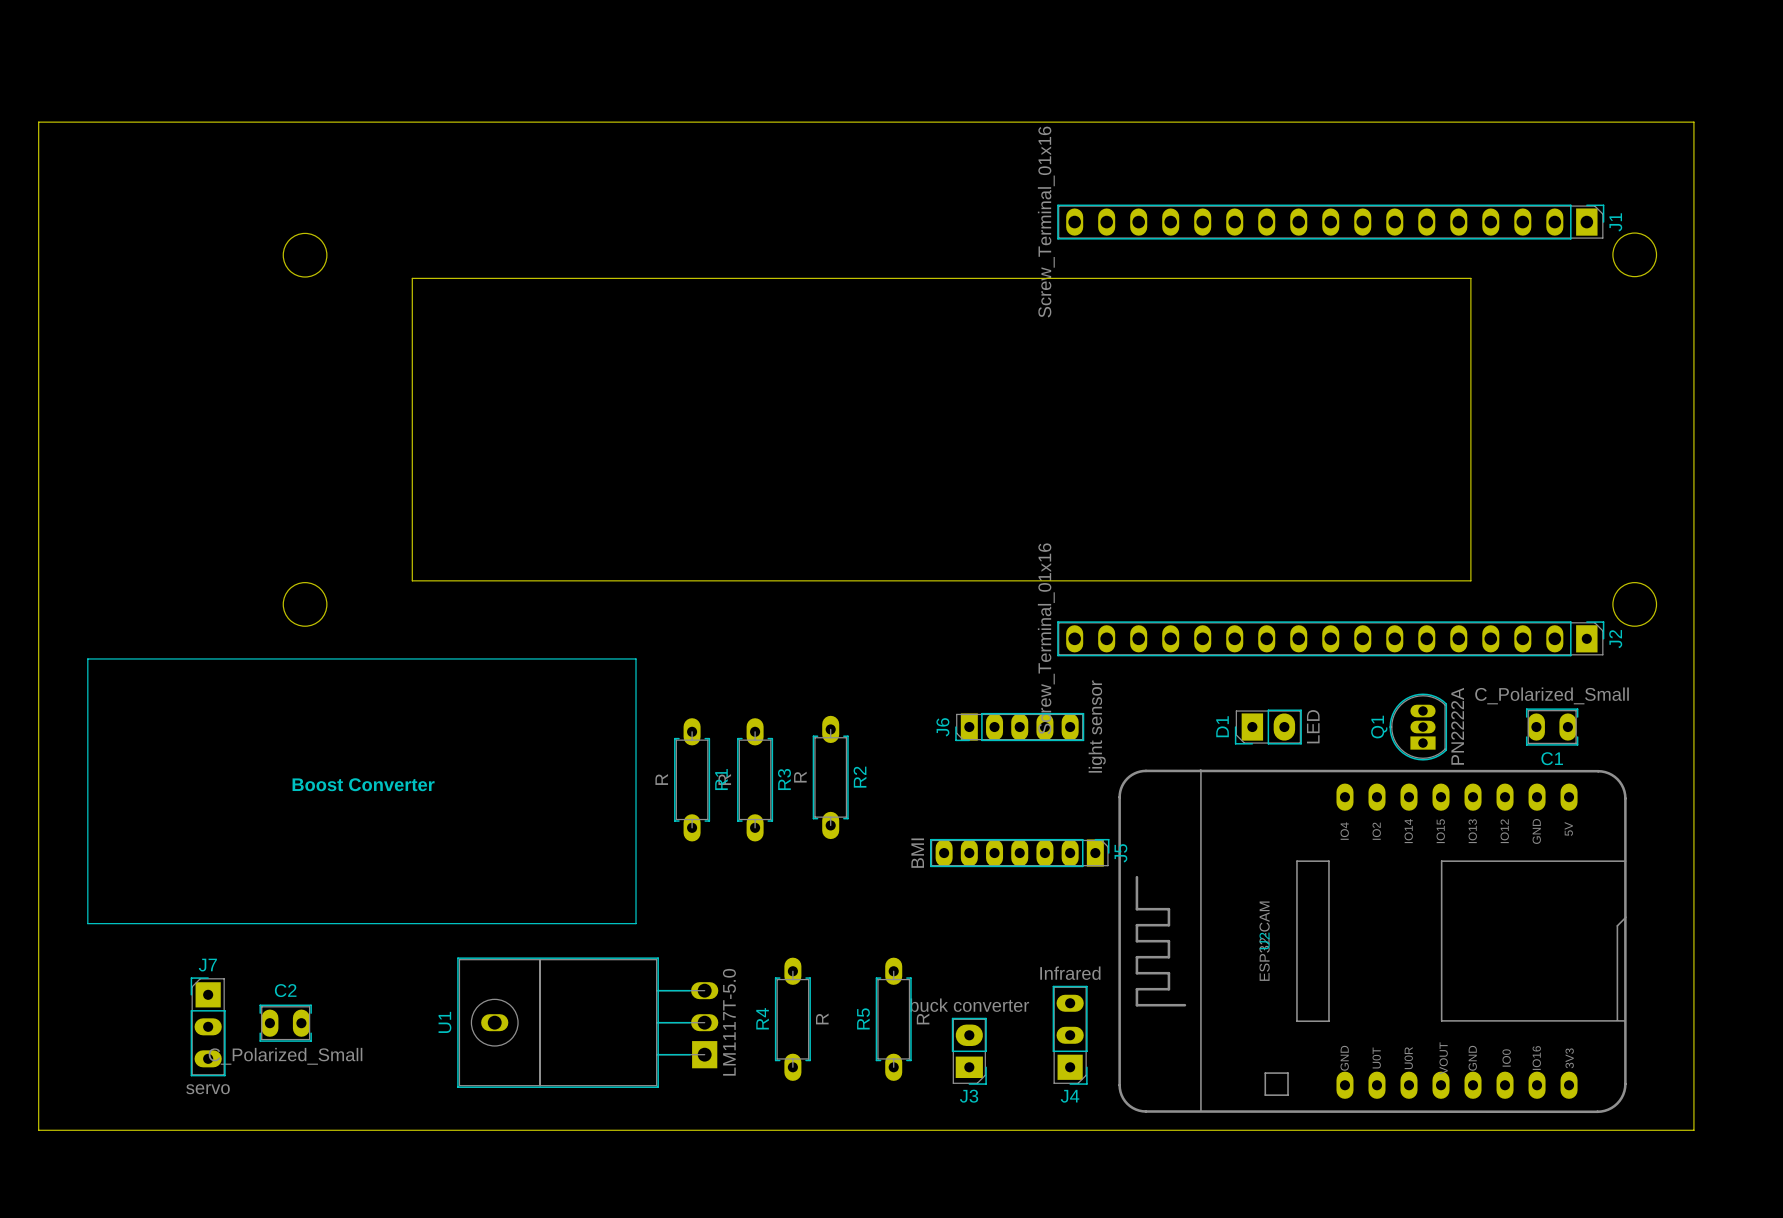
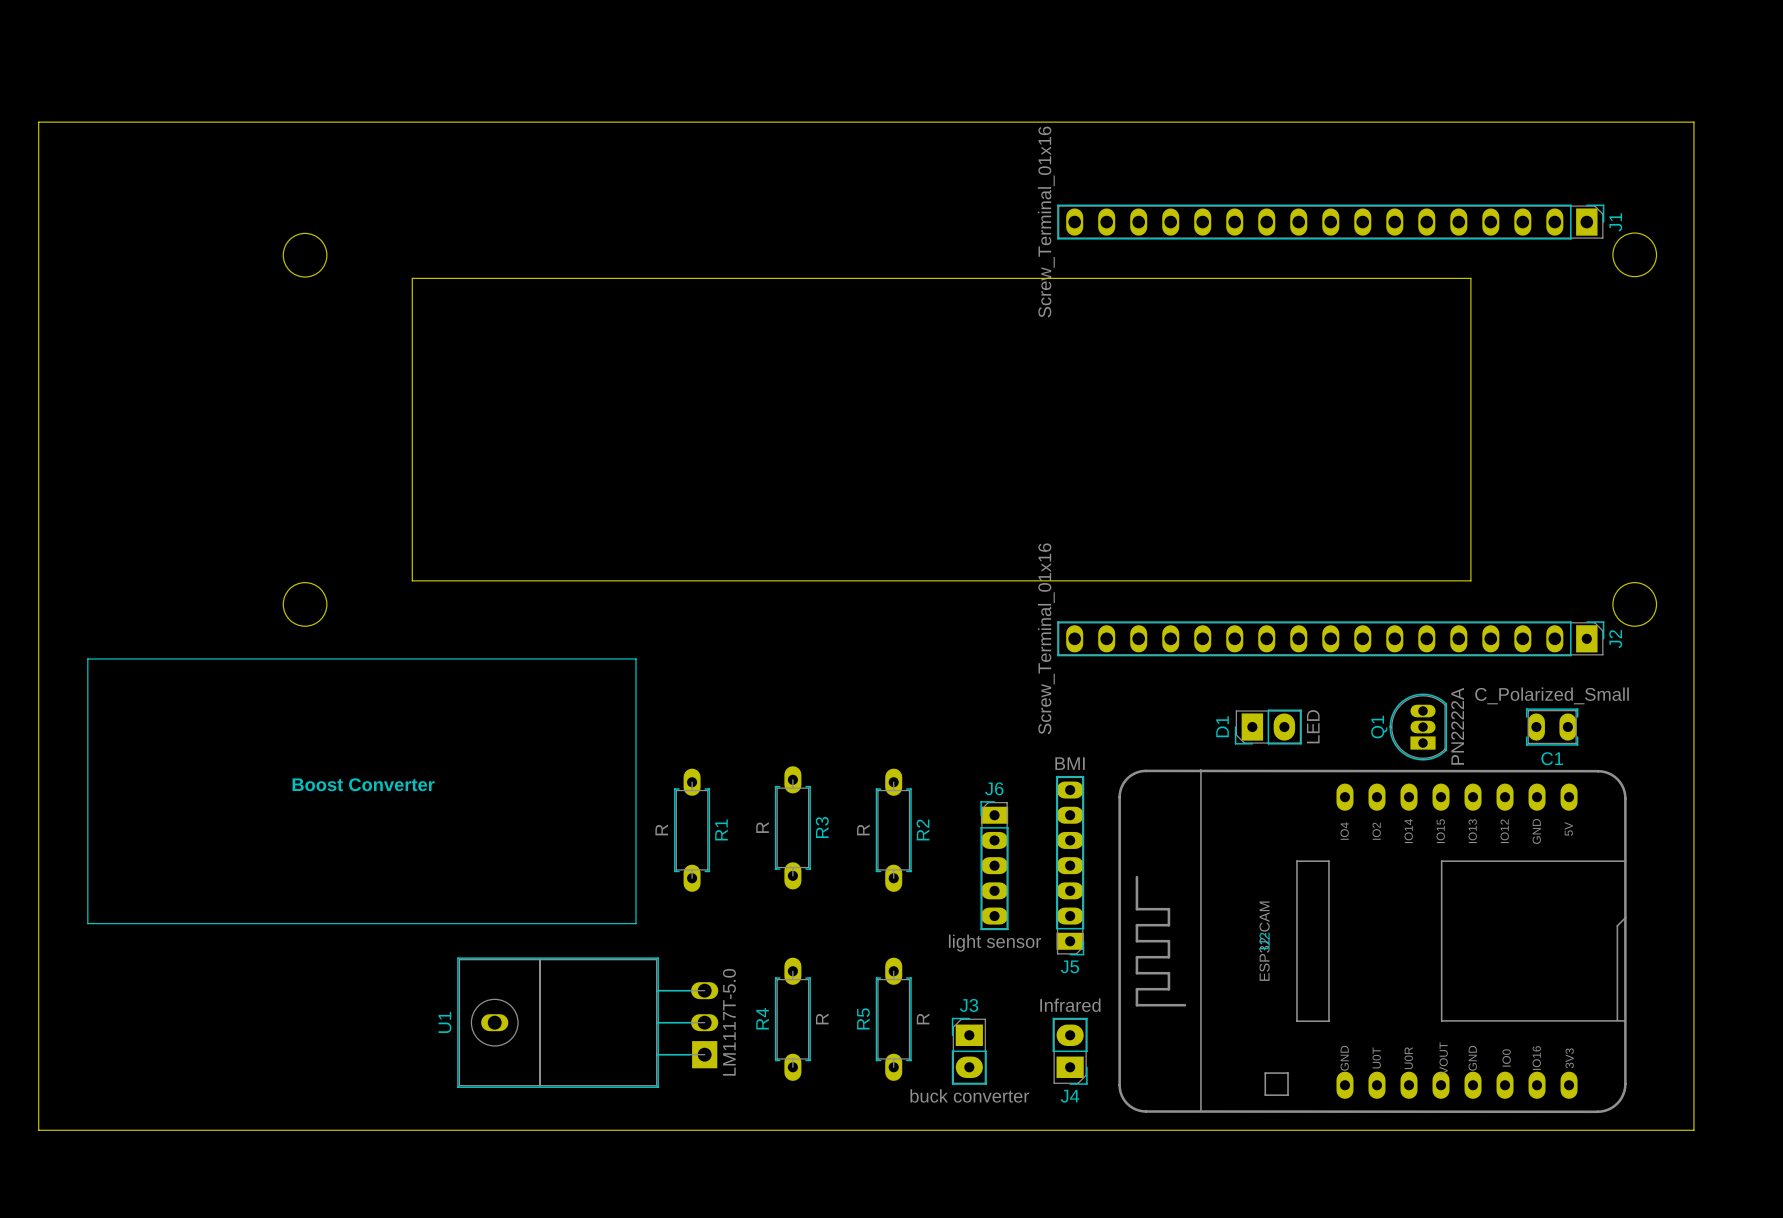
J6 rotation: 0° (1019, 727) -> 90° clockwise (994, 865)
J6 position: (1019, 727) -> (994, 865)
R2 position: (830, 777) -> (893, 830)
R1 position: (692, 779) -> (692, 830)
R3 position: (755, 779) -> (792, 827)
J5 rotation: 0° (1019, 853) -> 90° clockwise (1070, 865)
J4 footprint: [1052, 985, 1088, 1085] -> [1052, 1017, 1088, 1085]
C2: C_Polarized_Small (285, 1023) -> none
J7: servo (208, 1026) -> none
J3 rotation: 0° (969, 1051) -> 180° (969, 1051)

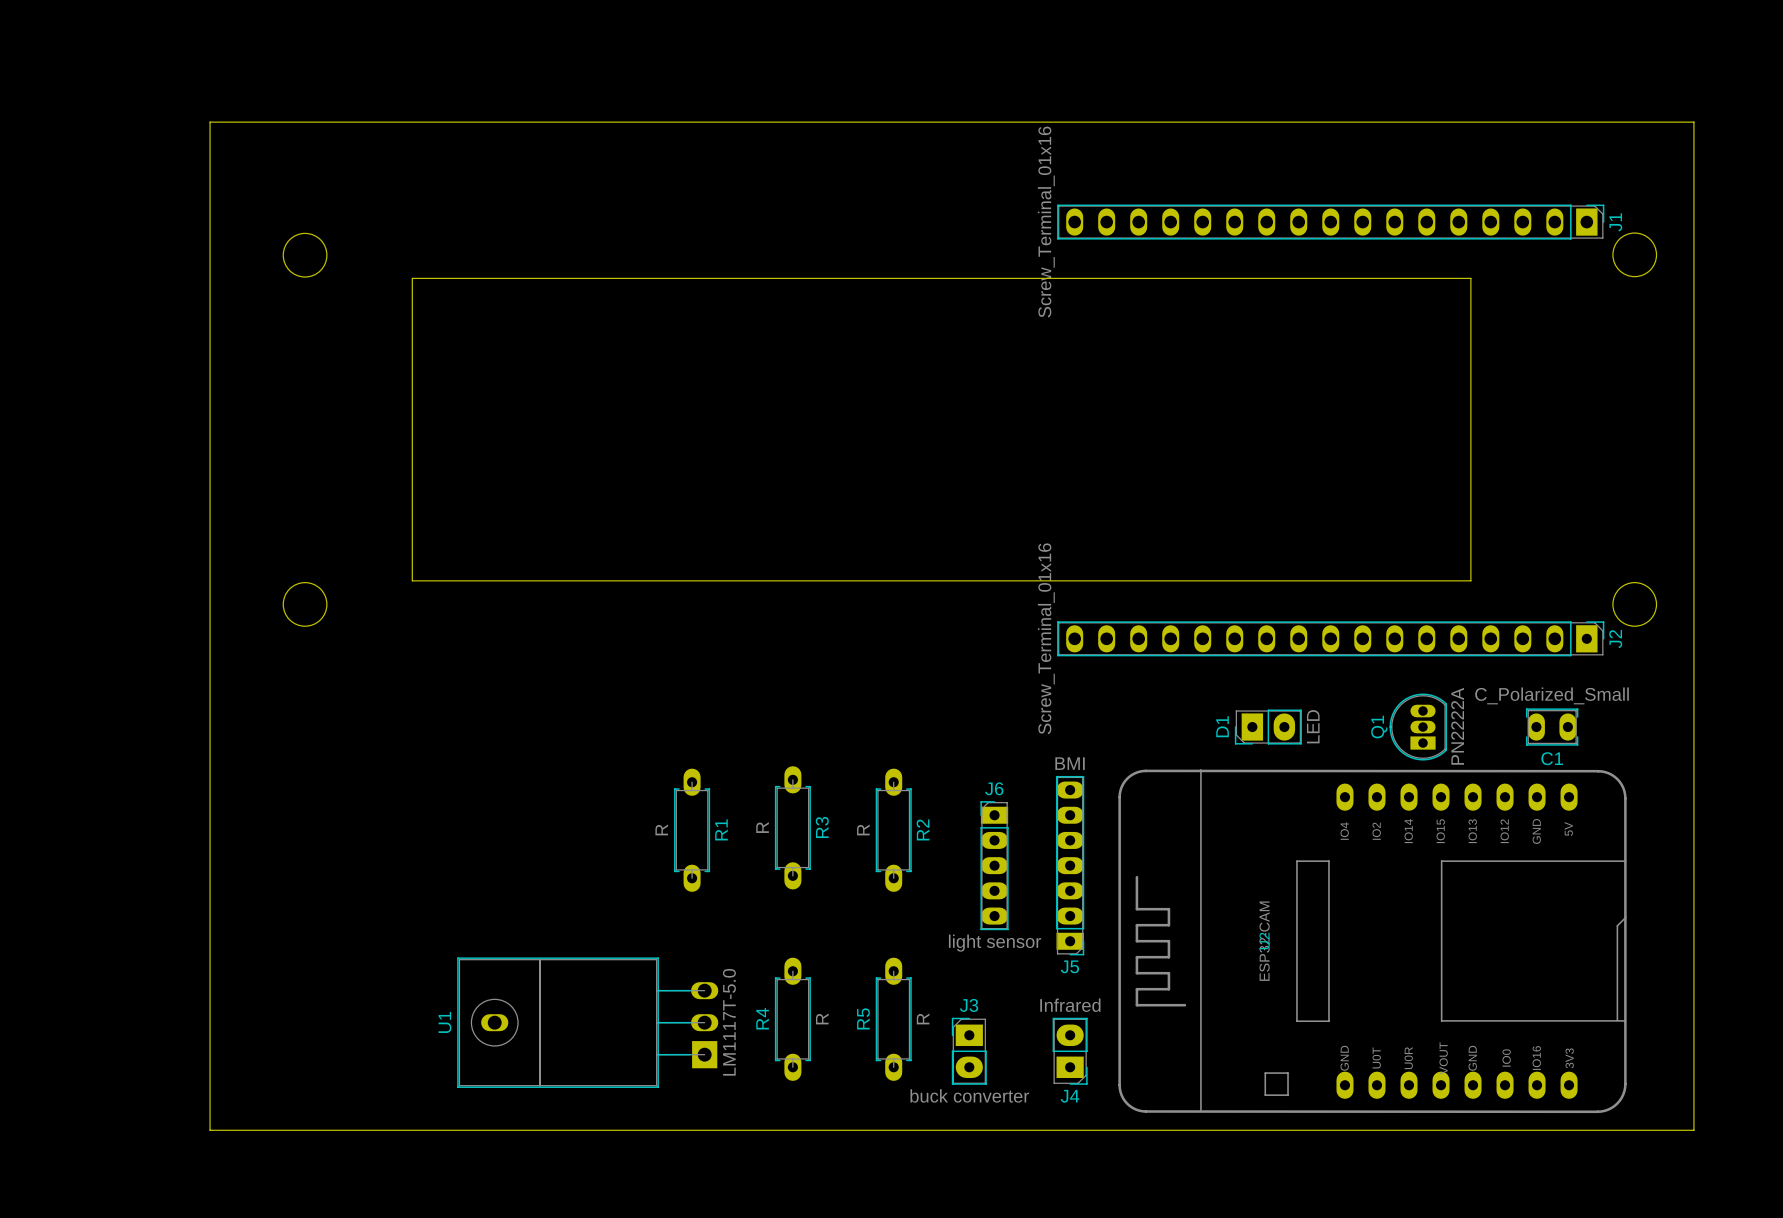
board edge: (210, 122) (38, 122) (38, 1130) (210, 1130) -> (210, 122) (210, 1130)
line: (87, 658) (636, 658) (636, 923) (87, 923) (87, 658) -> none
text: Boost Converter (363, 784) -> none

